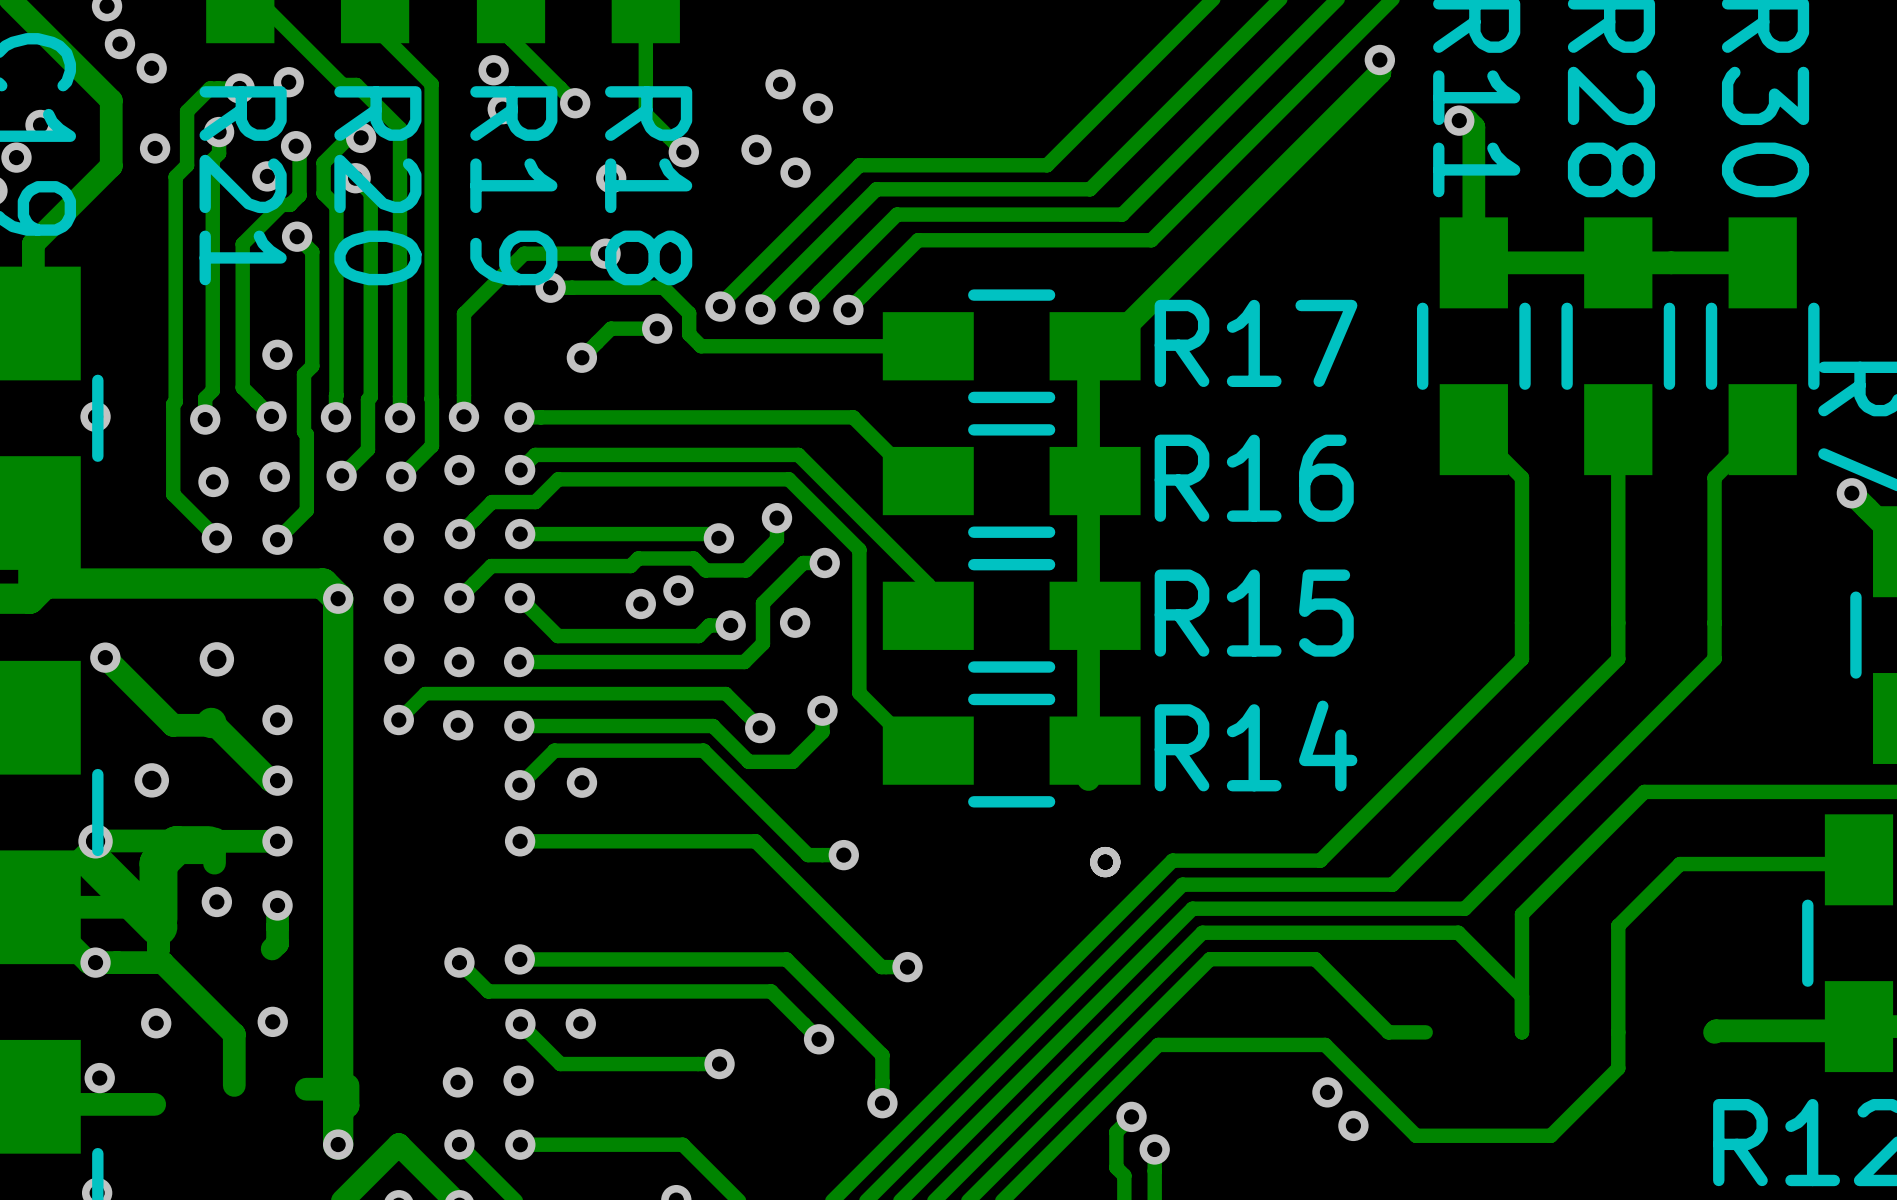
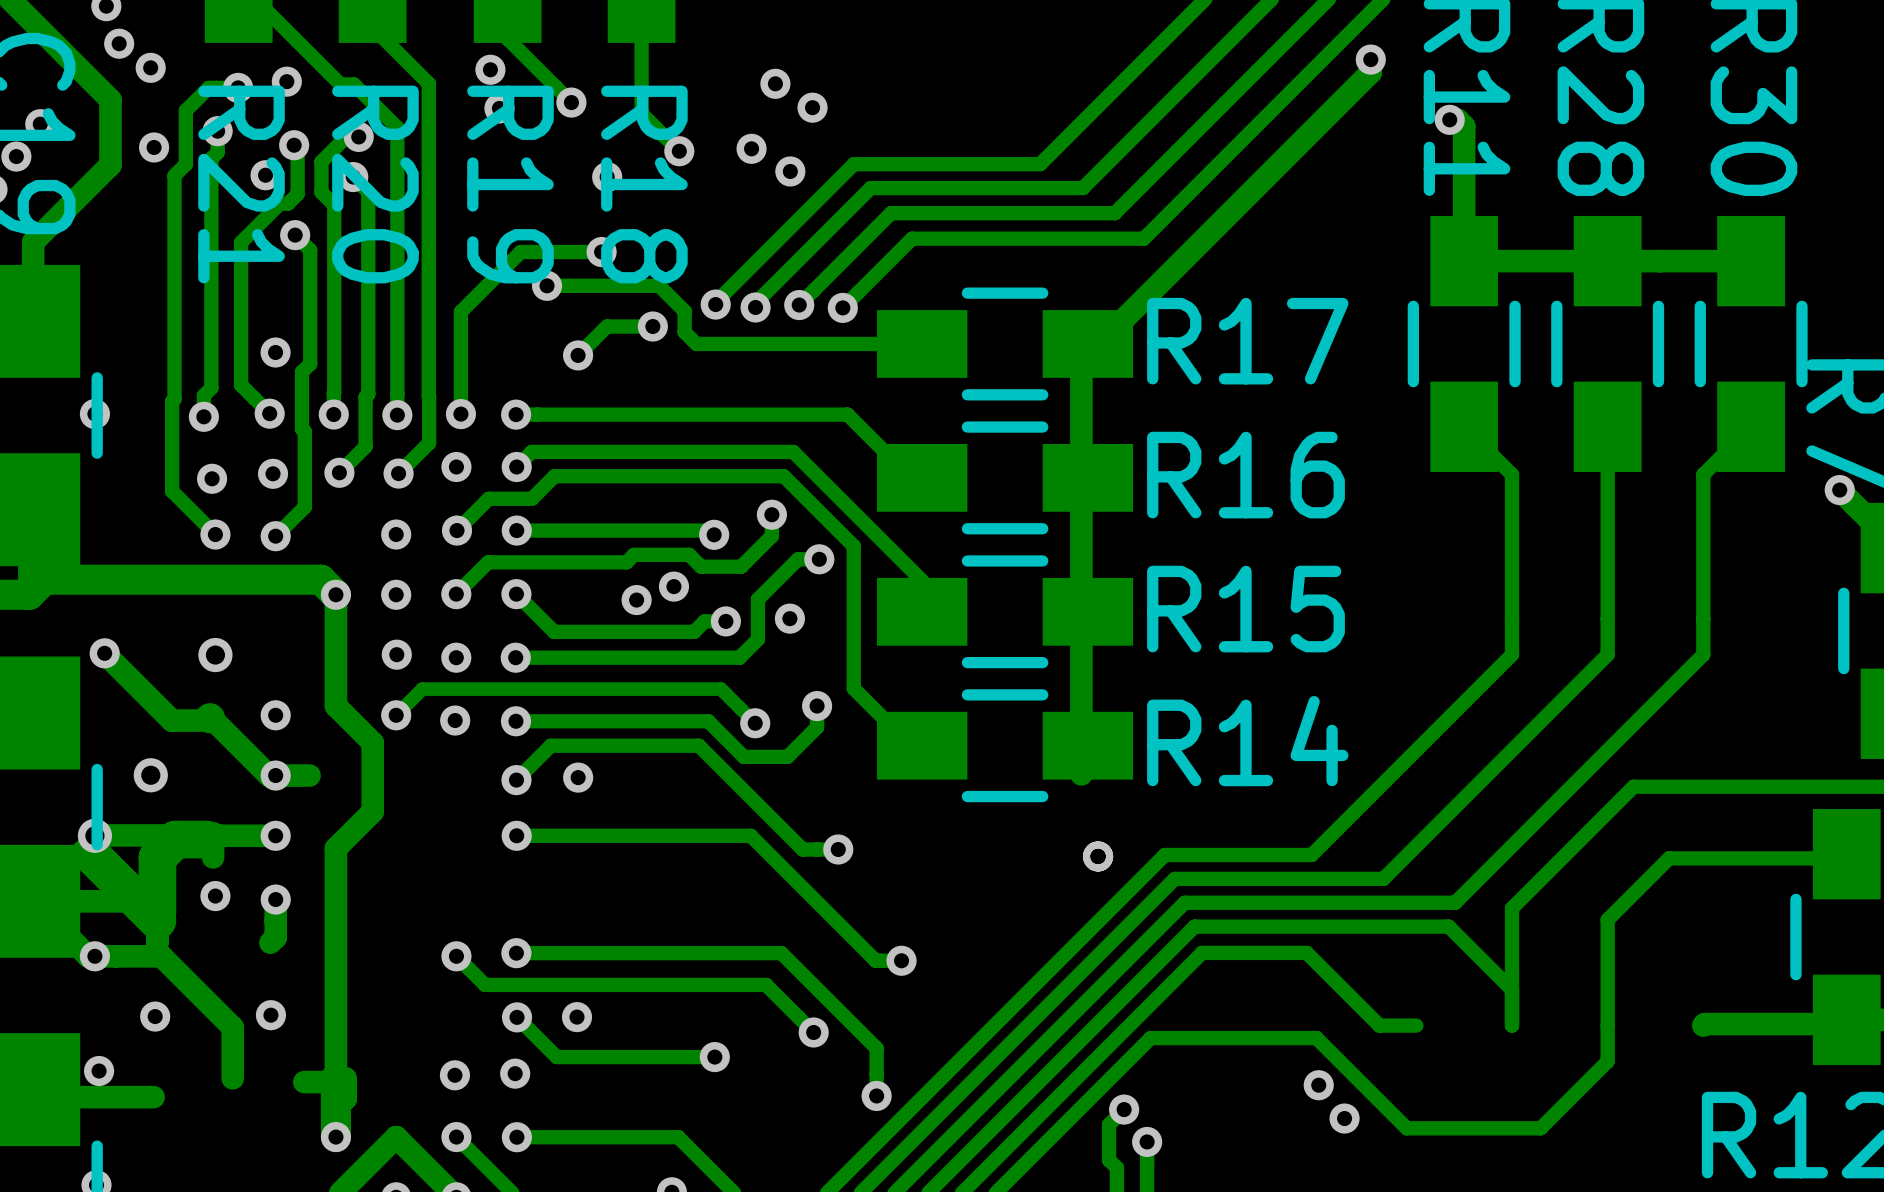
track width: thick (338, 598) (338, 710) -> thin (335, 594) (335, 705)
track: (338, 710) (338, 854) -> (335, 705) (372, 742) (372, 811) (335, 848)
track: none -> (309, 775) (275, 775)
track width: thick (338, 854) (338, 1085) -> thin (335, 848) (335, 1078)

